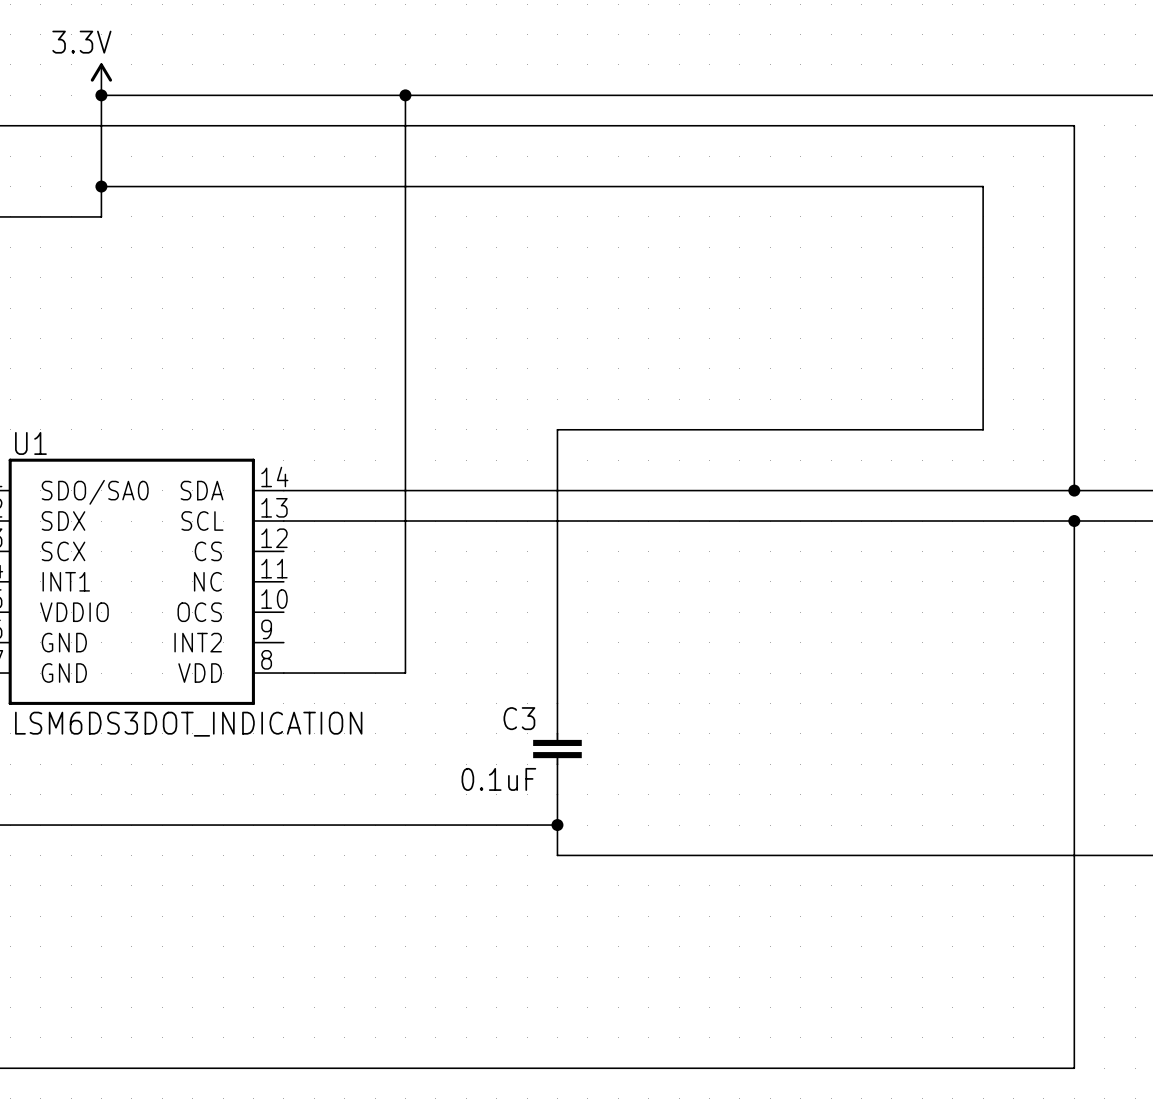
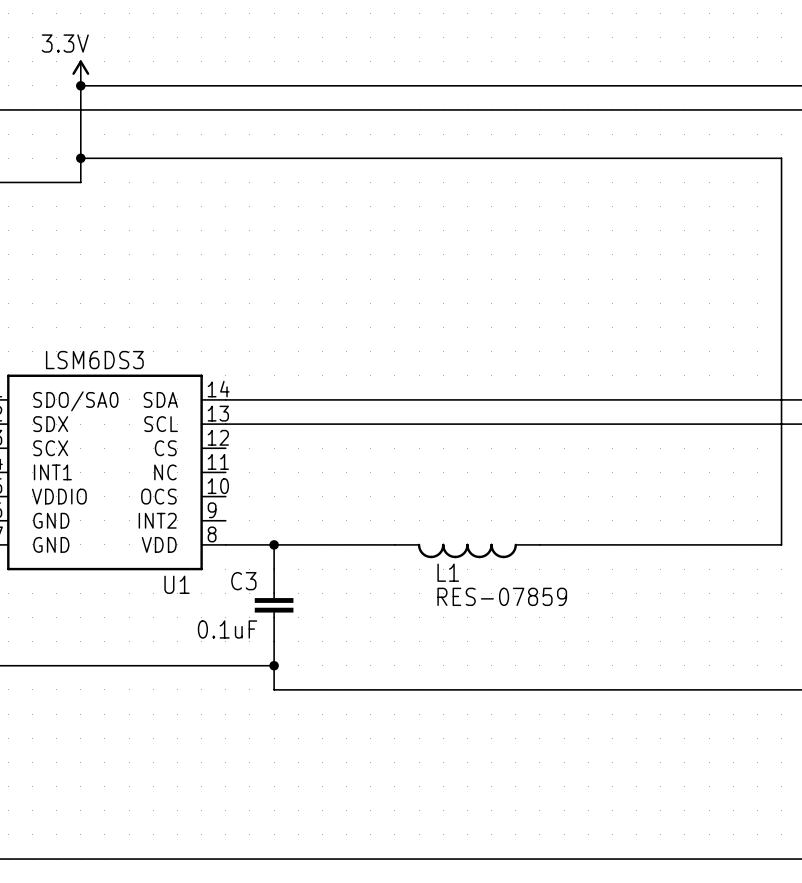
wire: (405, 95) (405, 673) -> (394, 544) (322, 544)
junction: (405, 95) -> none
wire: (983, 429) (557, 429) (557, 703) -> (781, 351) (781, 544) (539, 544)
U1 name position: U1 (30, 443) -> U1 (177, 584)
wire: none -> (274, 544) (274, 569)
junction: none -> (274, 544)
L1: none -> RES-07859 (467, 550)
U1 value: LSM6DS3DOT_INDICATION (188, 724) -> LSM6DS3 (94, 360)
C3 position: (557, 749) -> (274, 605)
wire: (557, 794) (557, 855) -> (274, 641) (274, 689) (443, 689)
wire: (344, 825) (557, 825) -> none
junction: none -> (274, 665)
junction: (557, 825) -> none

